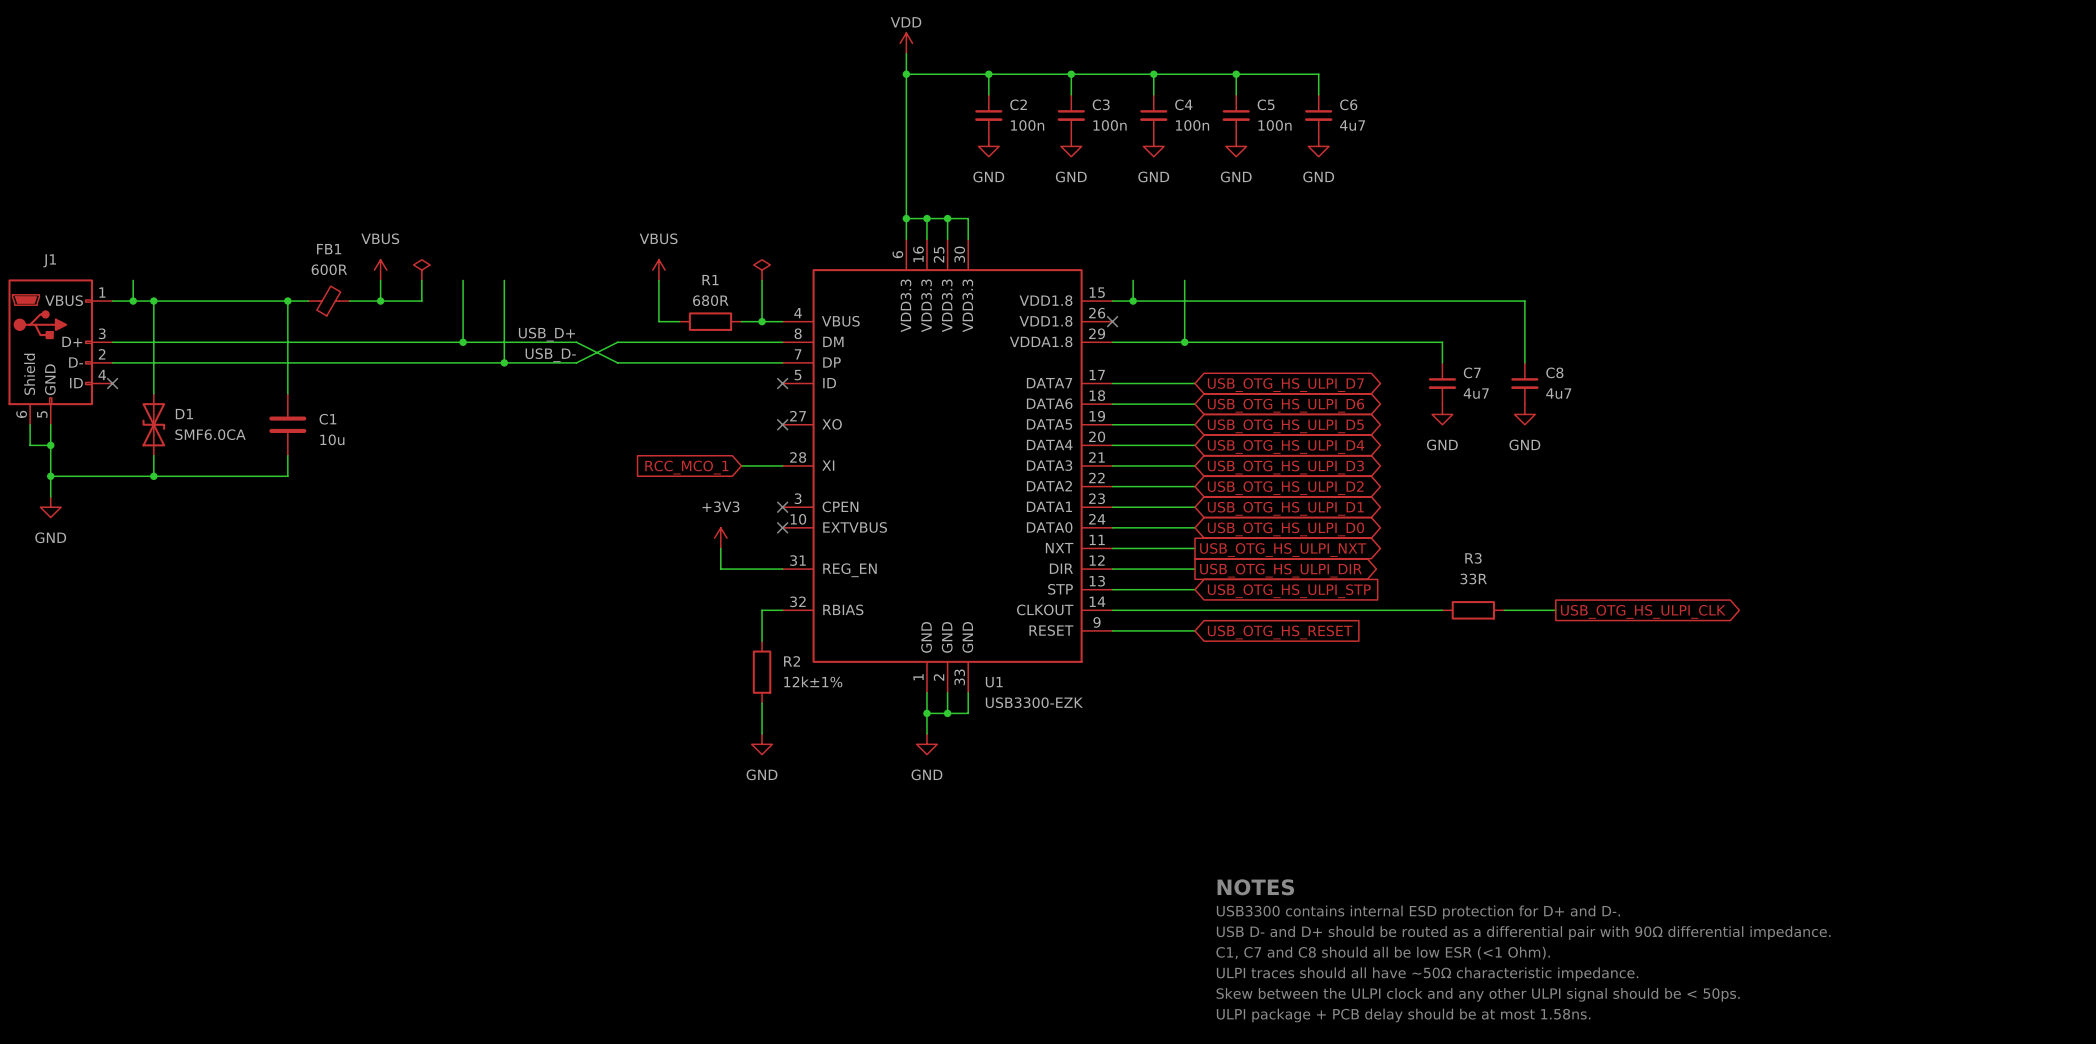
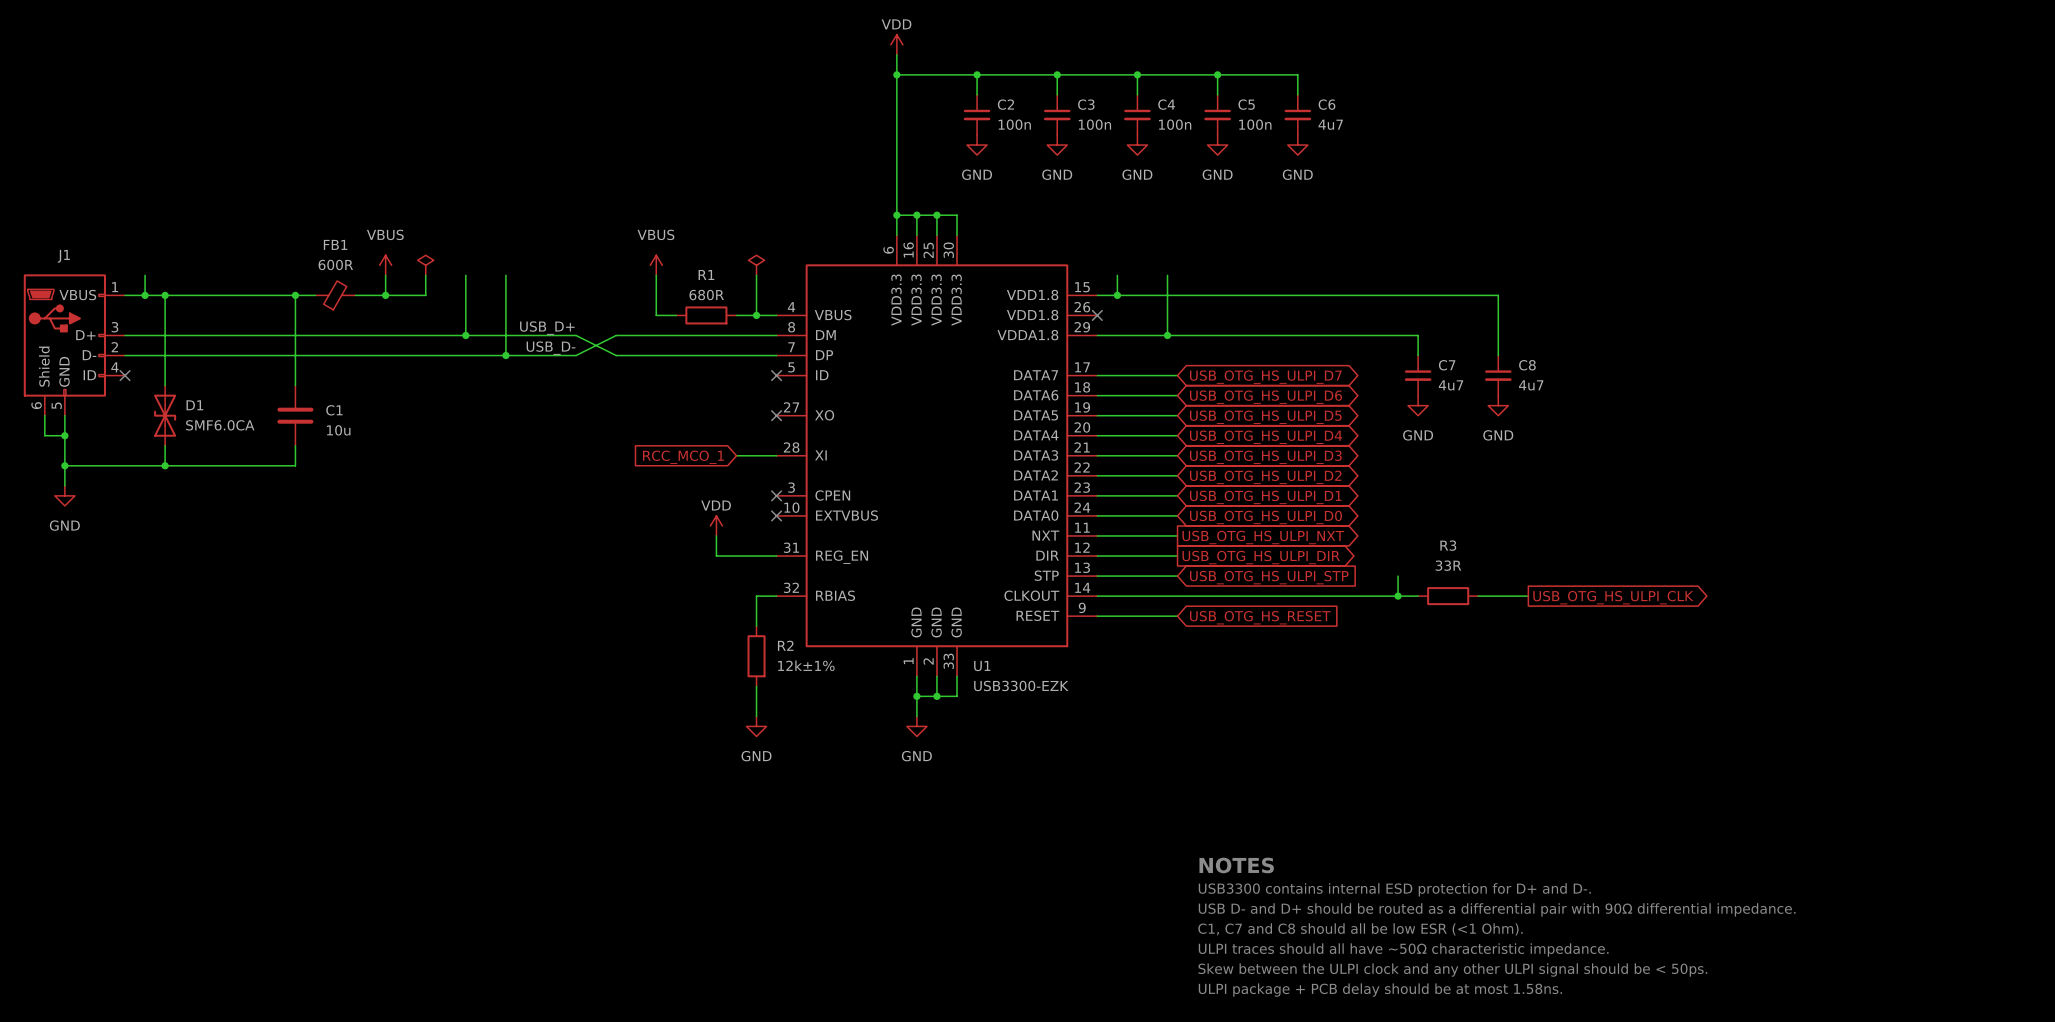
power symbol: +3V3 (720, 538) -> VDD (716, 525)
wire: none -> (1398, 576) (1398, 596)
junction: none -> (1398, 596)

